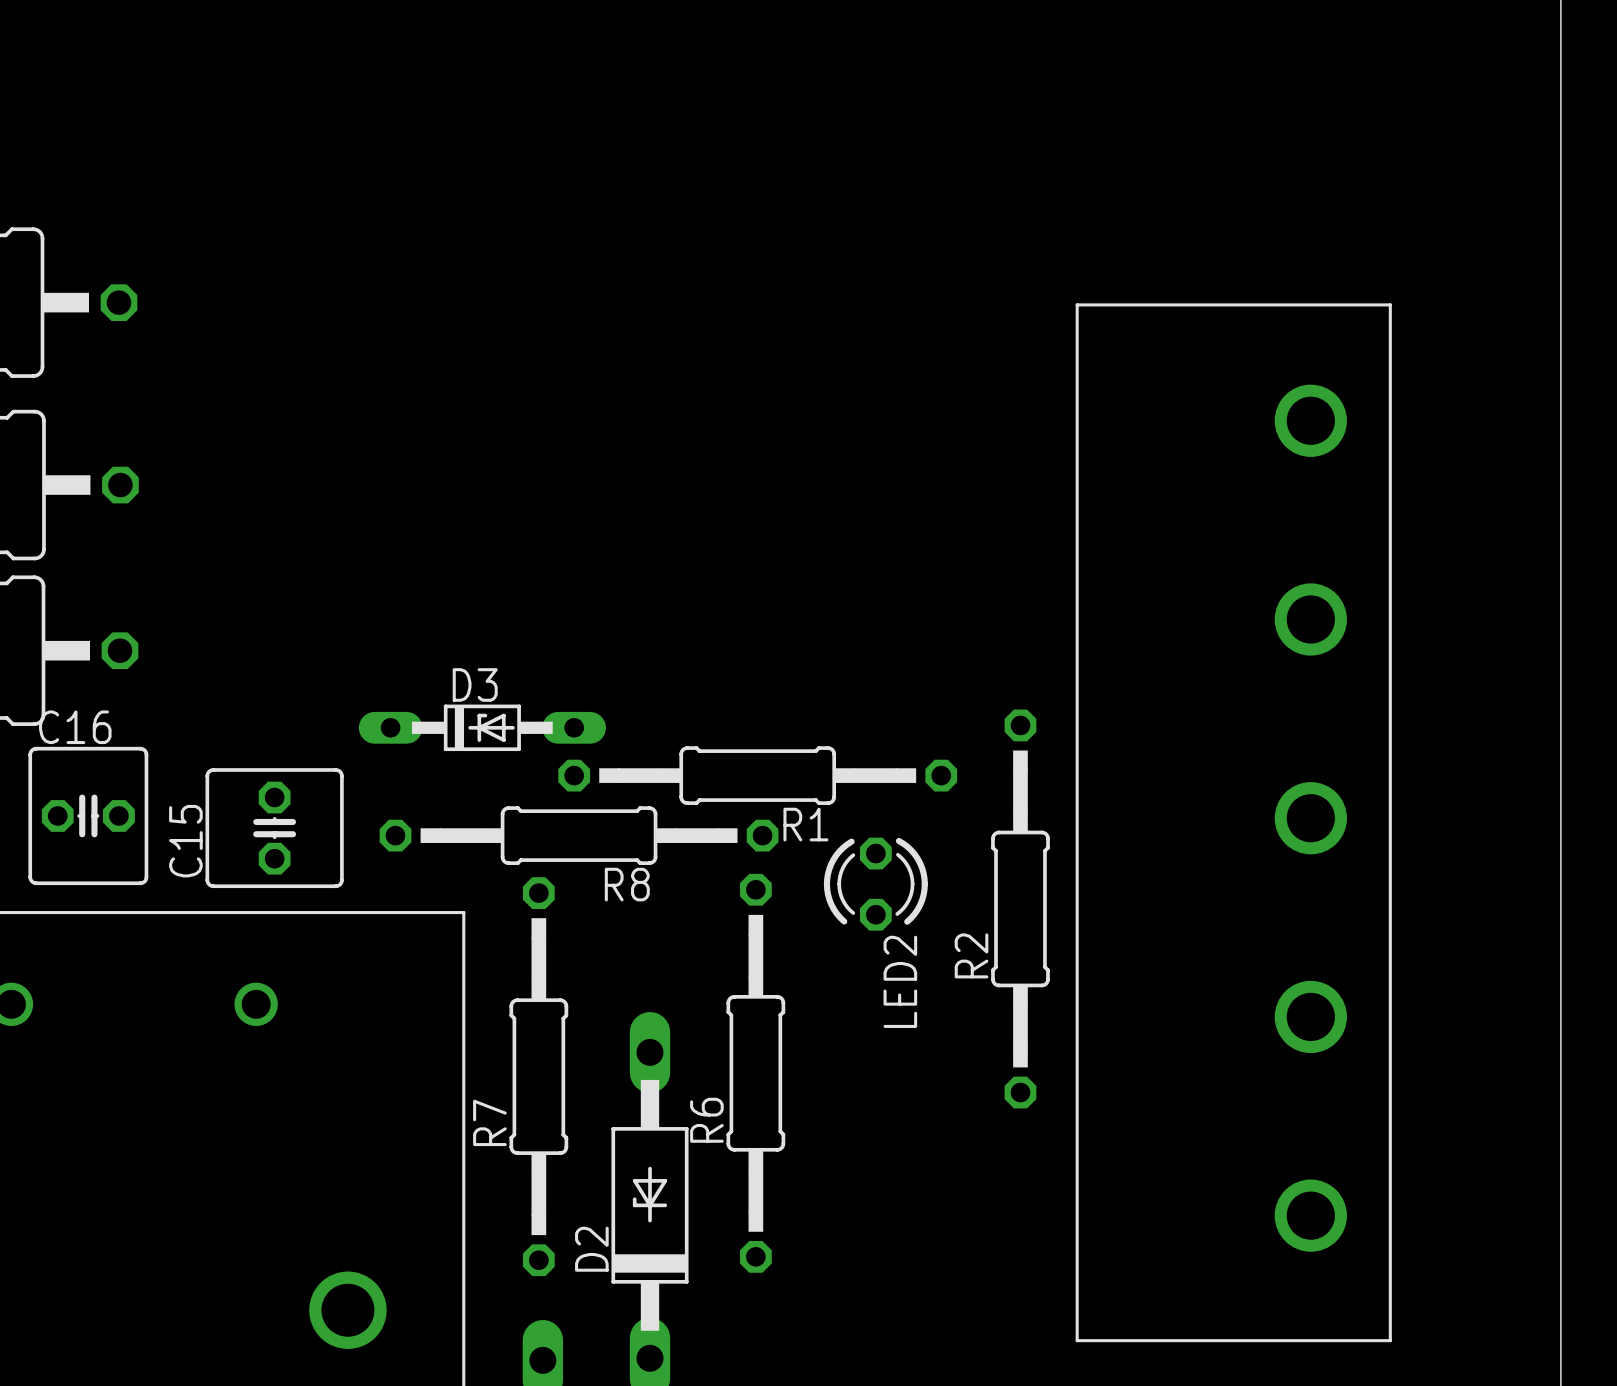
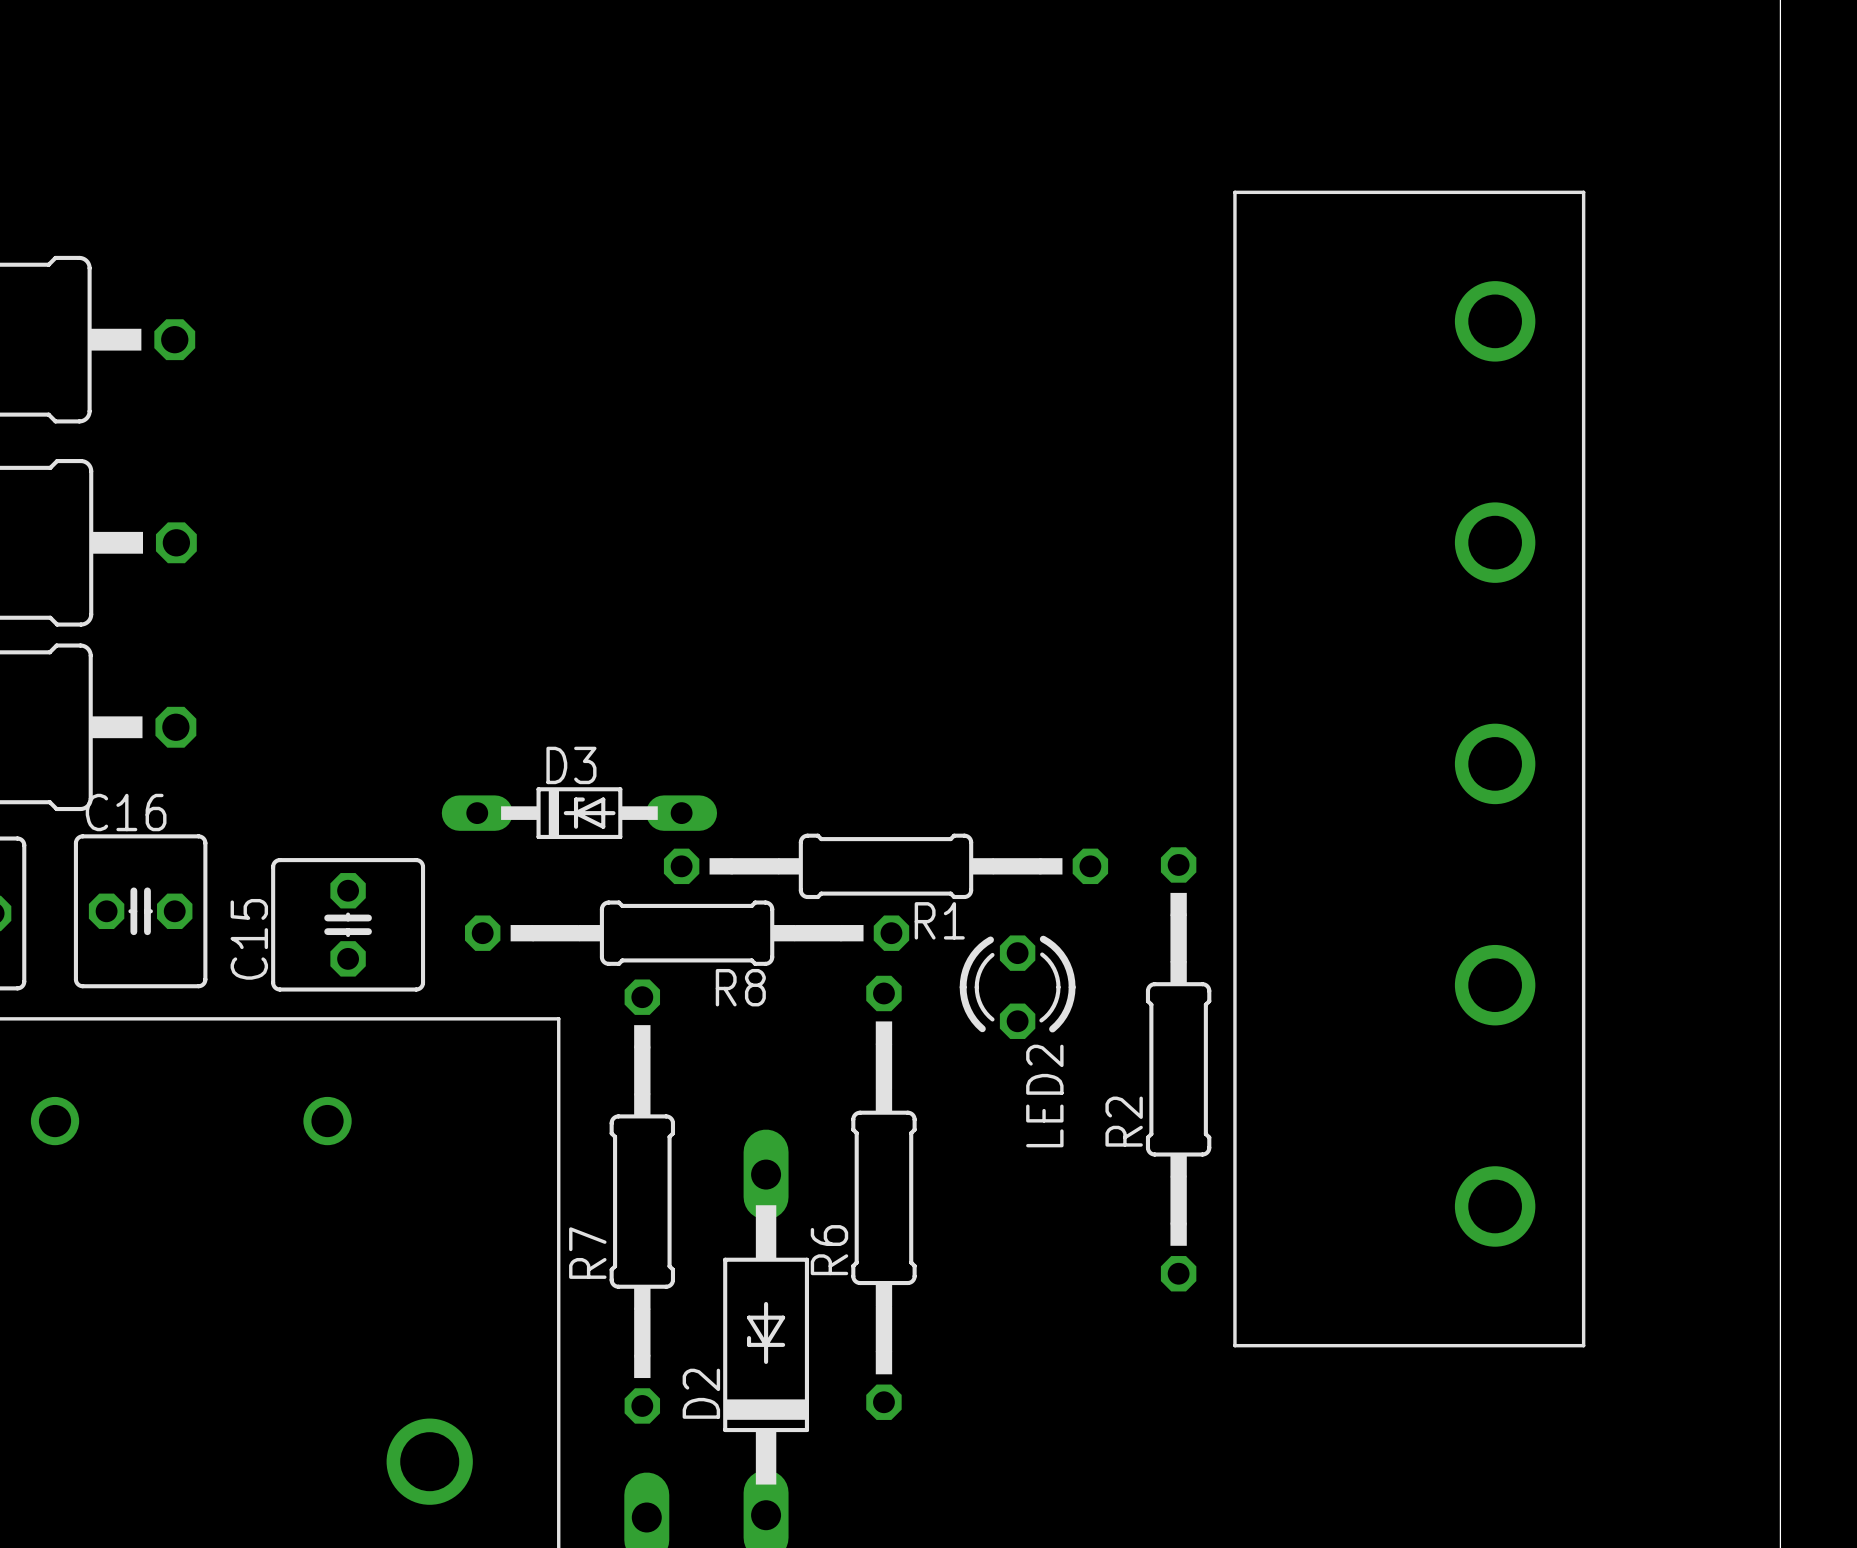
part position: (1233, 822) -> (1409, 769)
R2 position: (1020, 908) -> (1178, 1069)

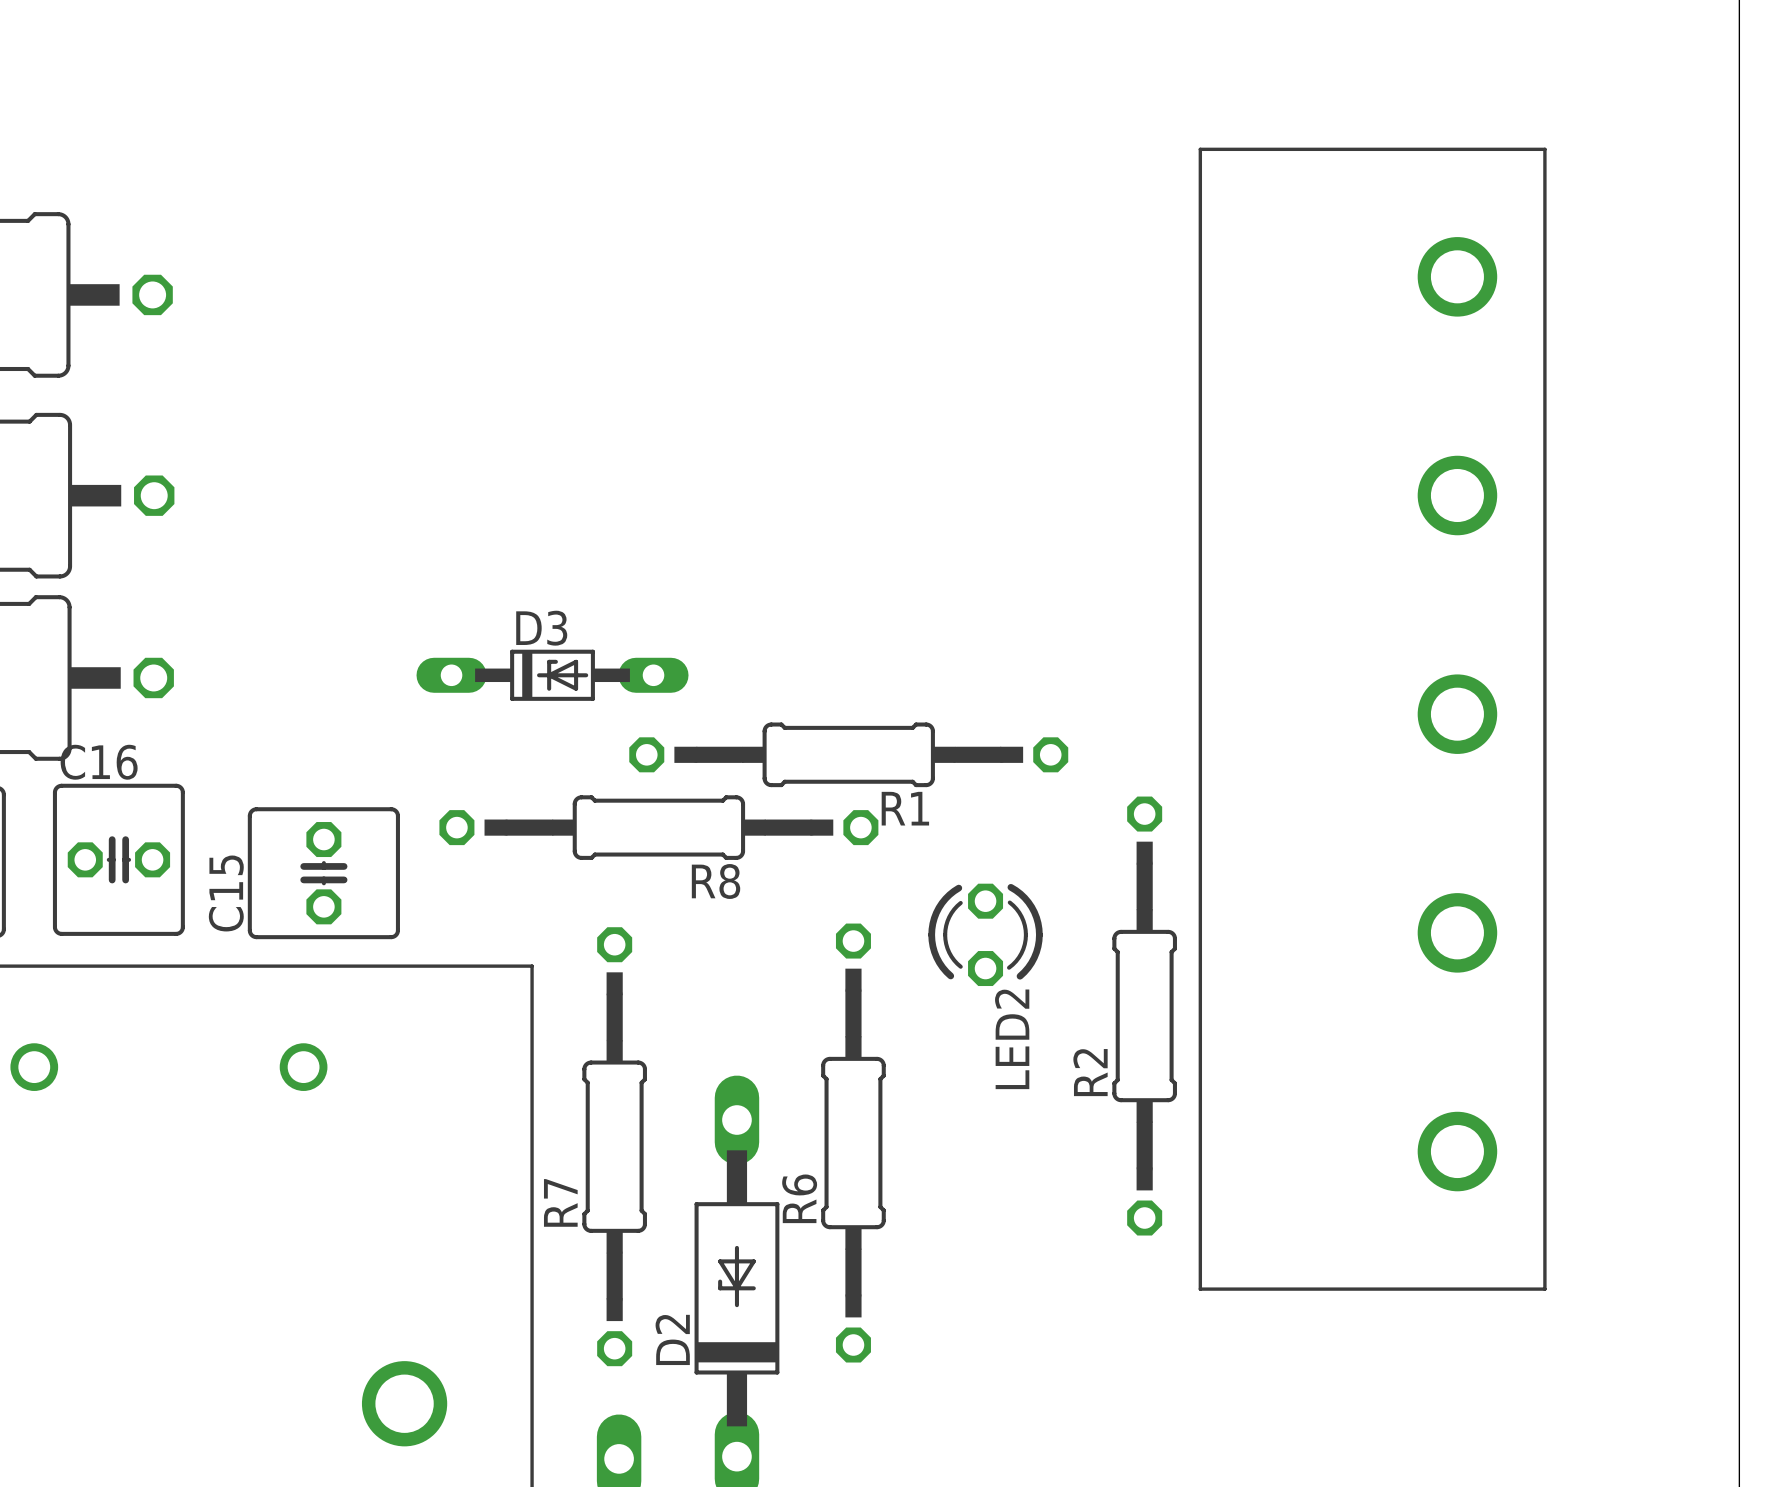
D3 position: (579, 813) -> (552, 675)
R1 position: (886, 866) -> (848, 754)
R8 position: (687, 933) -> (658, 827)

